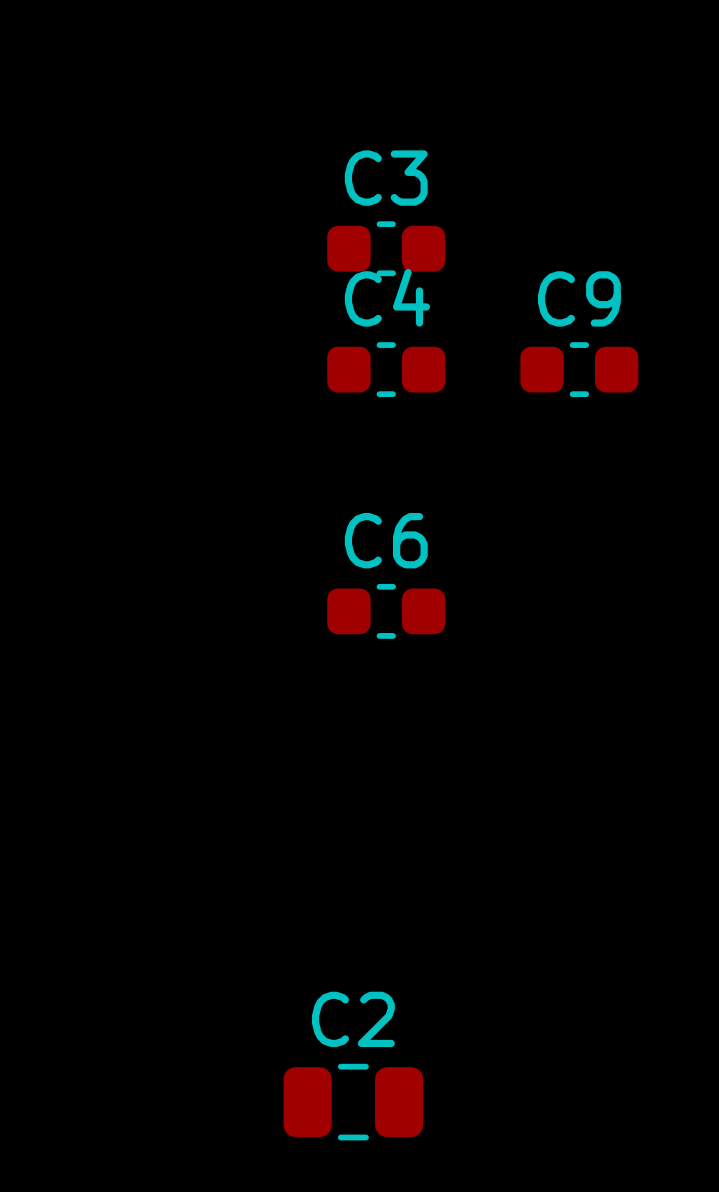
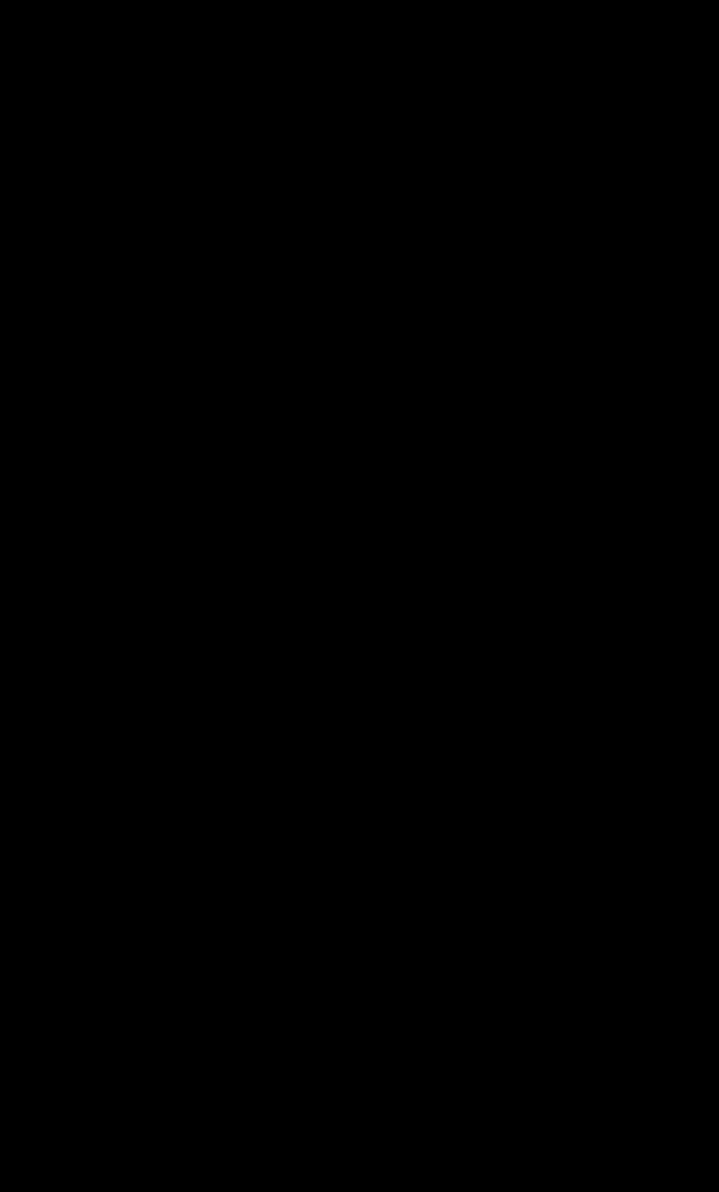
C3: (386, 248) -> none
C4: (386, 369) -> none
C9: (579, 369) -> none
C6: (386, 611) -> none
C2: (353, 1102) -> none

